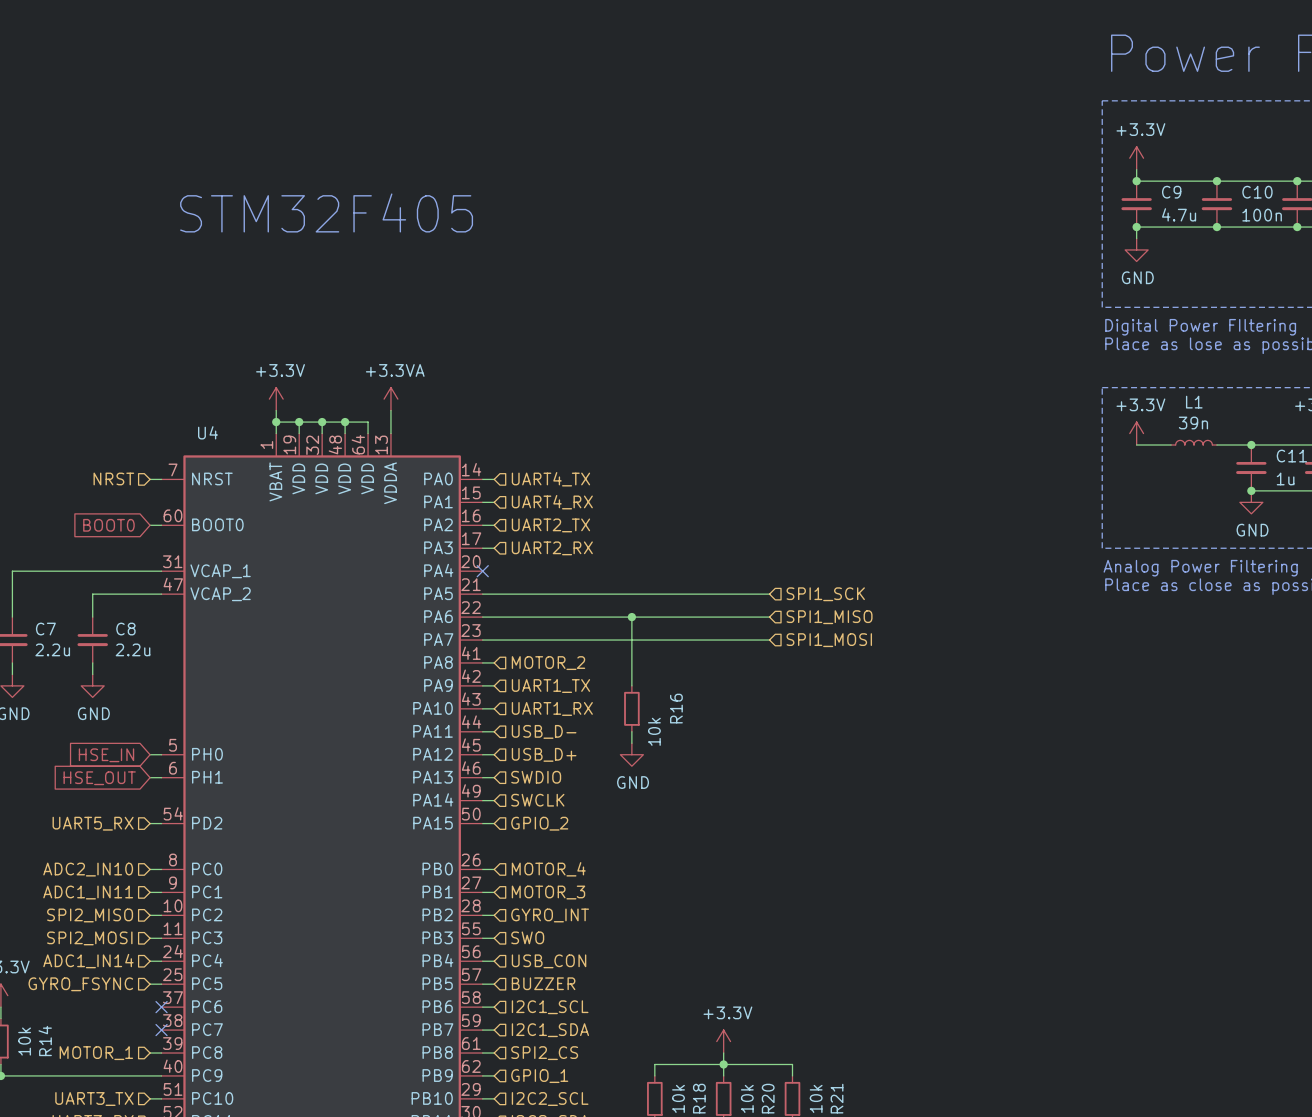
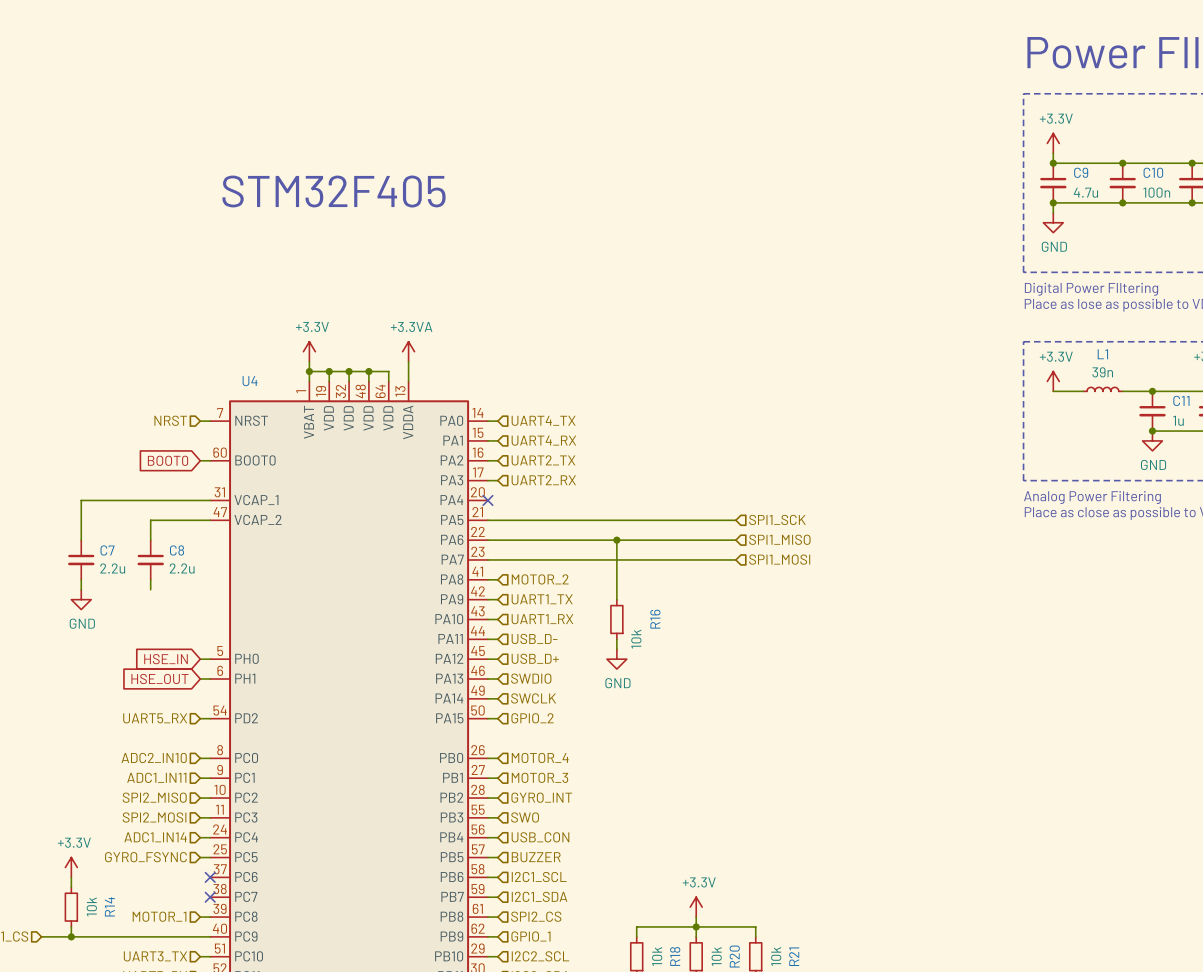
power symbol: GND (92, 685) -> none

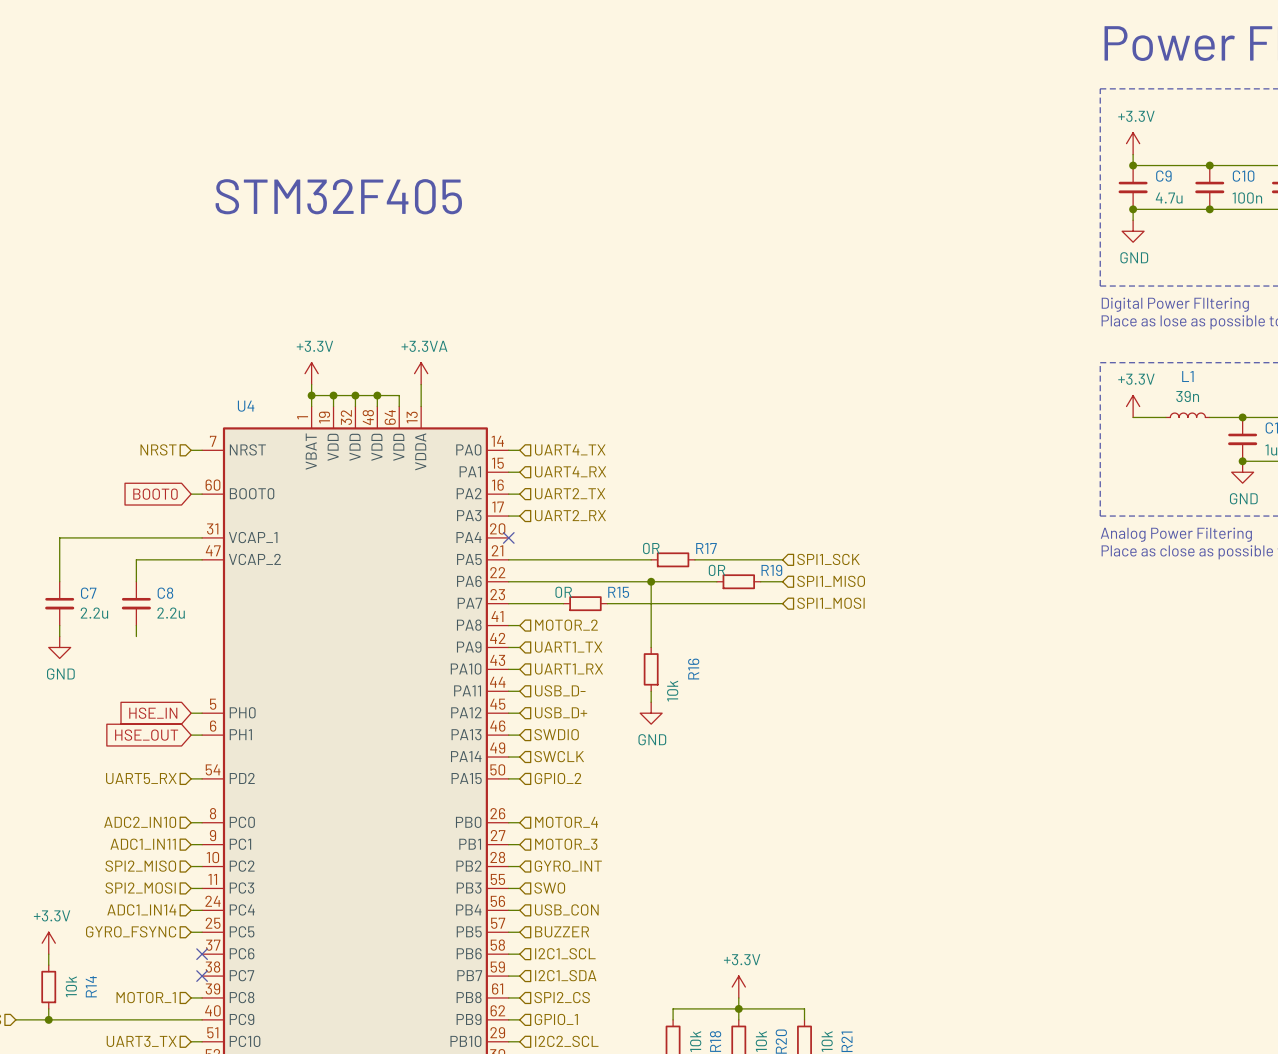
wire: (616, 520) (656, 520) -> none
R17: none -> 0R (673, 559)
wire: (676, 540) (716, 540) -> none
R19: none -> 0R (738, 581)
wire: (537, 559) (577, 559) -> none
R15: none -> 0R (585, 603)

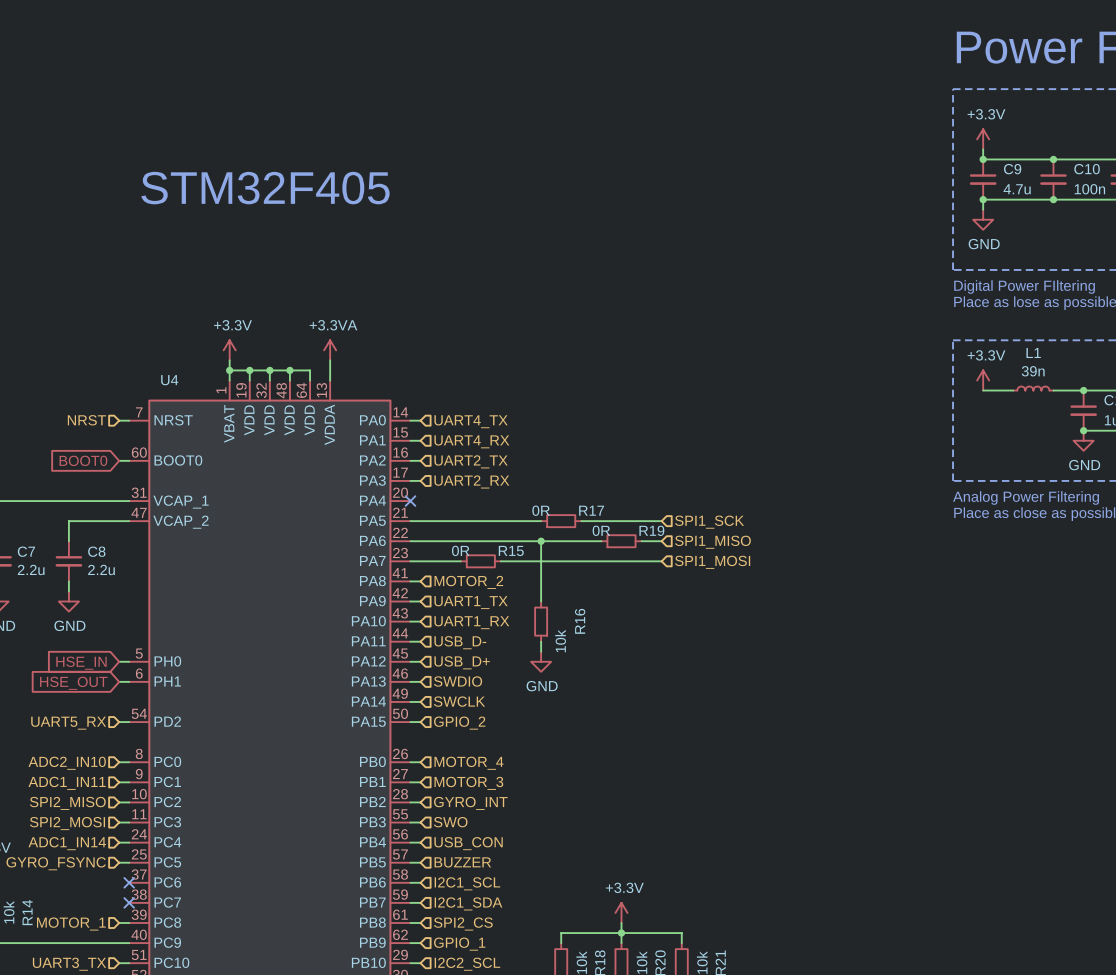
power symbol: none -> GND (68, 601)

